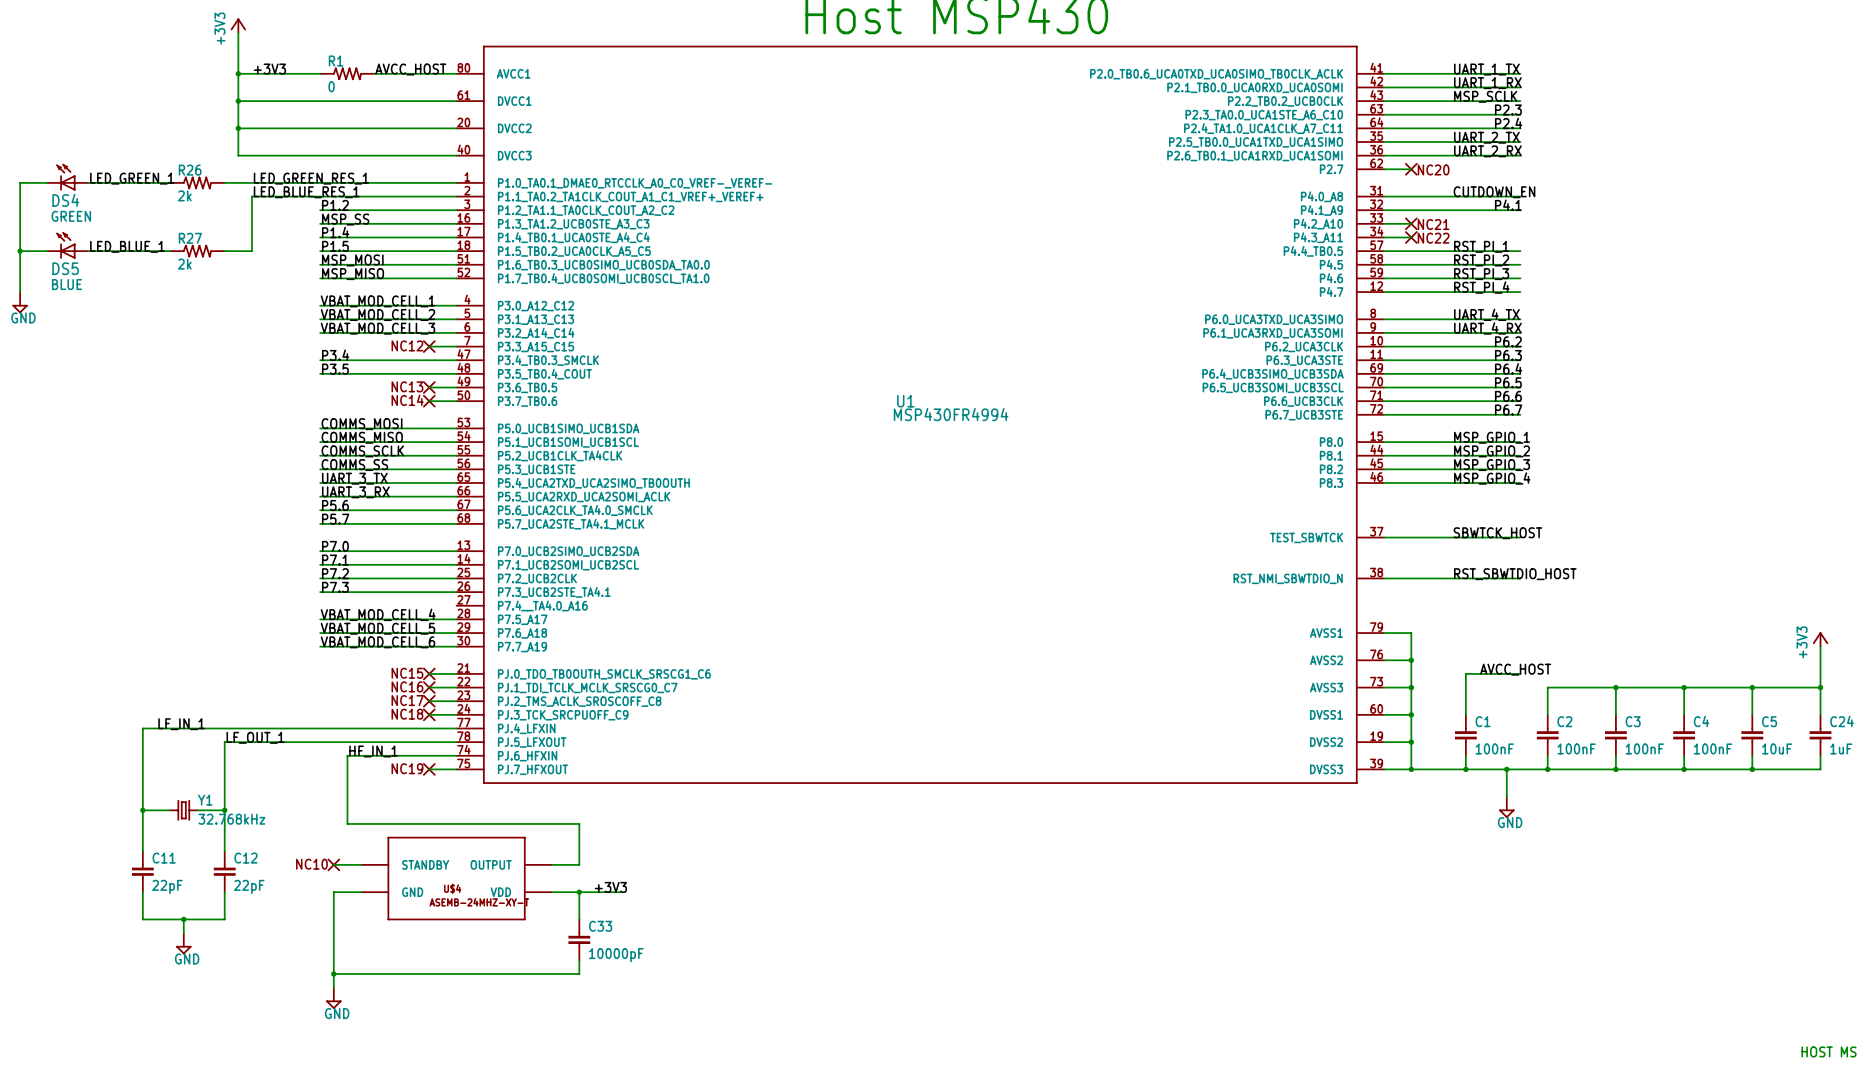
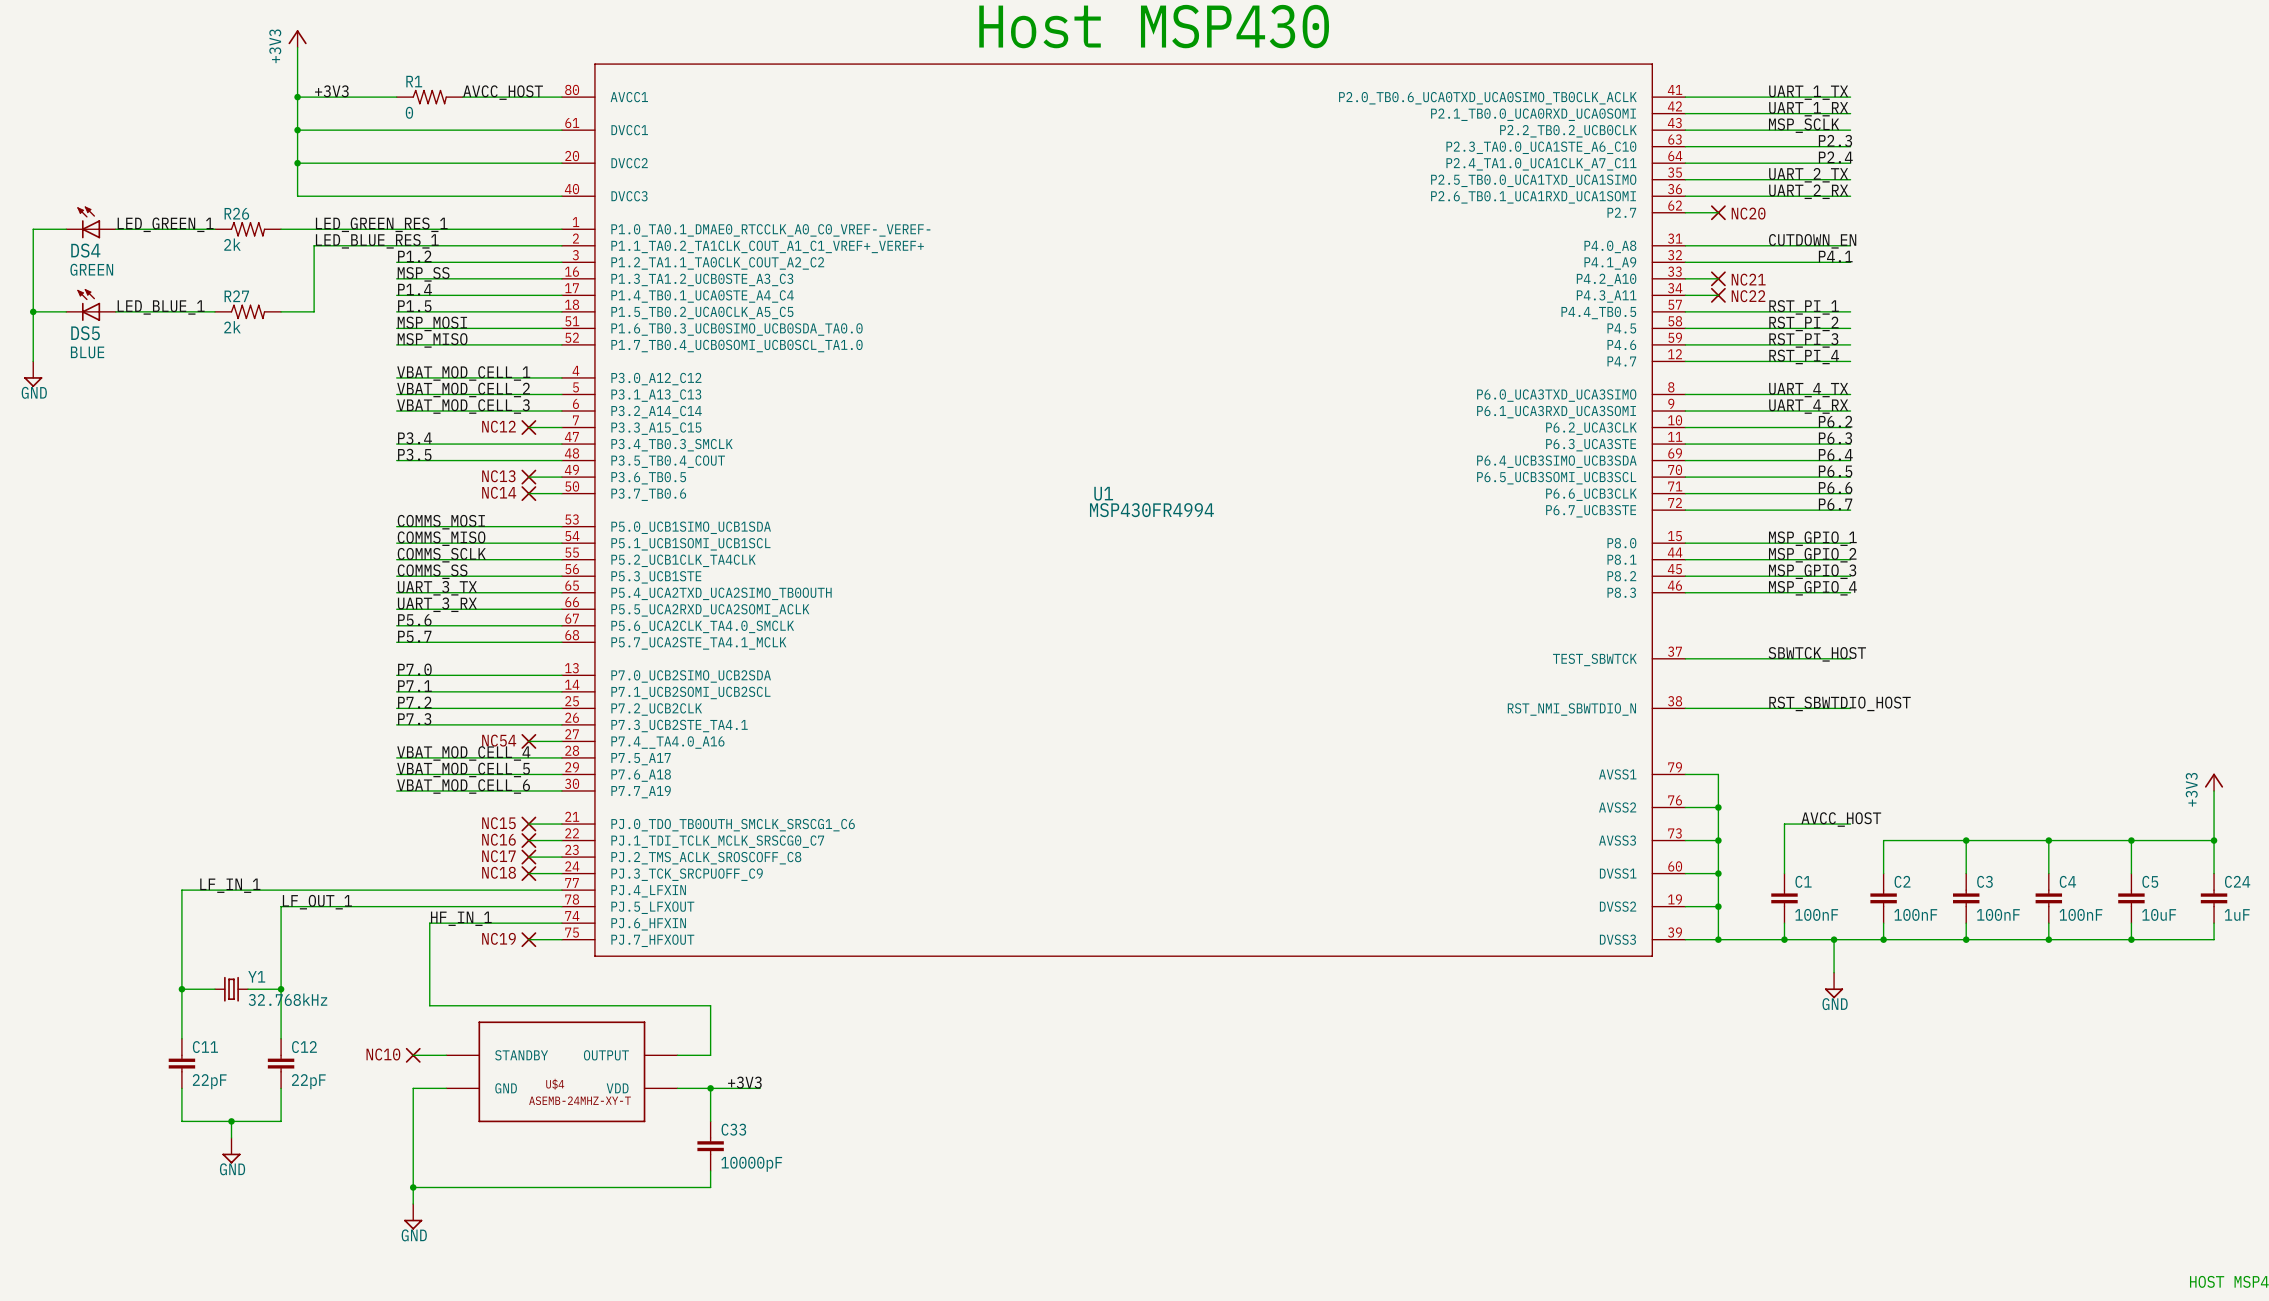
wire: none -> (528, 741) (561, 741)
NC54: none -> (528, 741)

